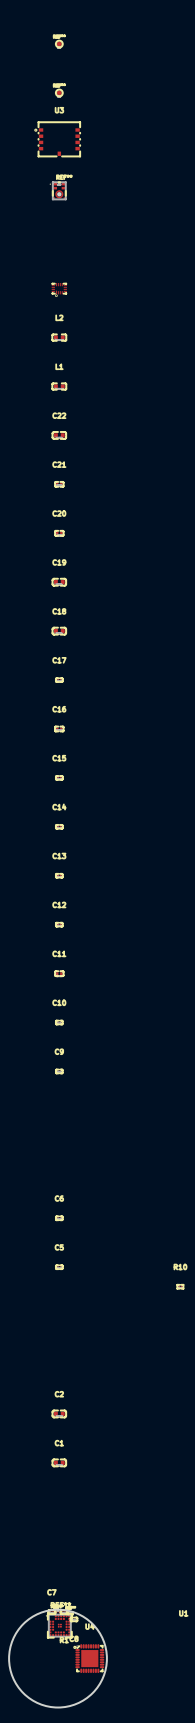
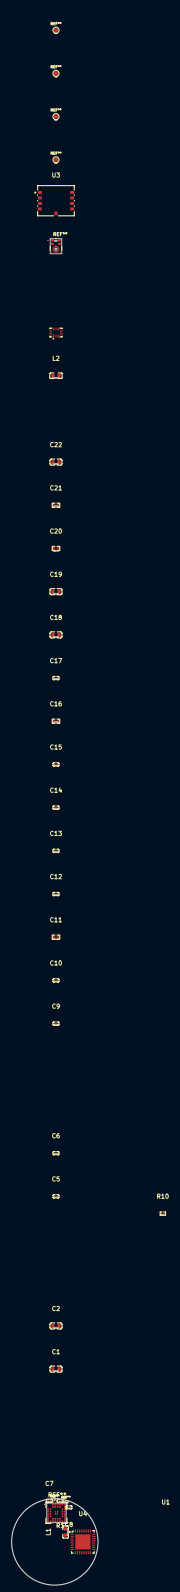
part rotation: 0° (59, 386) -> 90° counterclockwise (65, 1531)
part position: (59, 386) -> (65, 1531)

